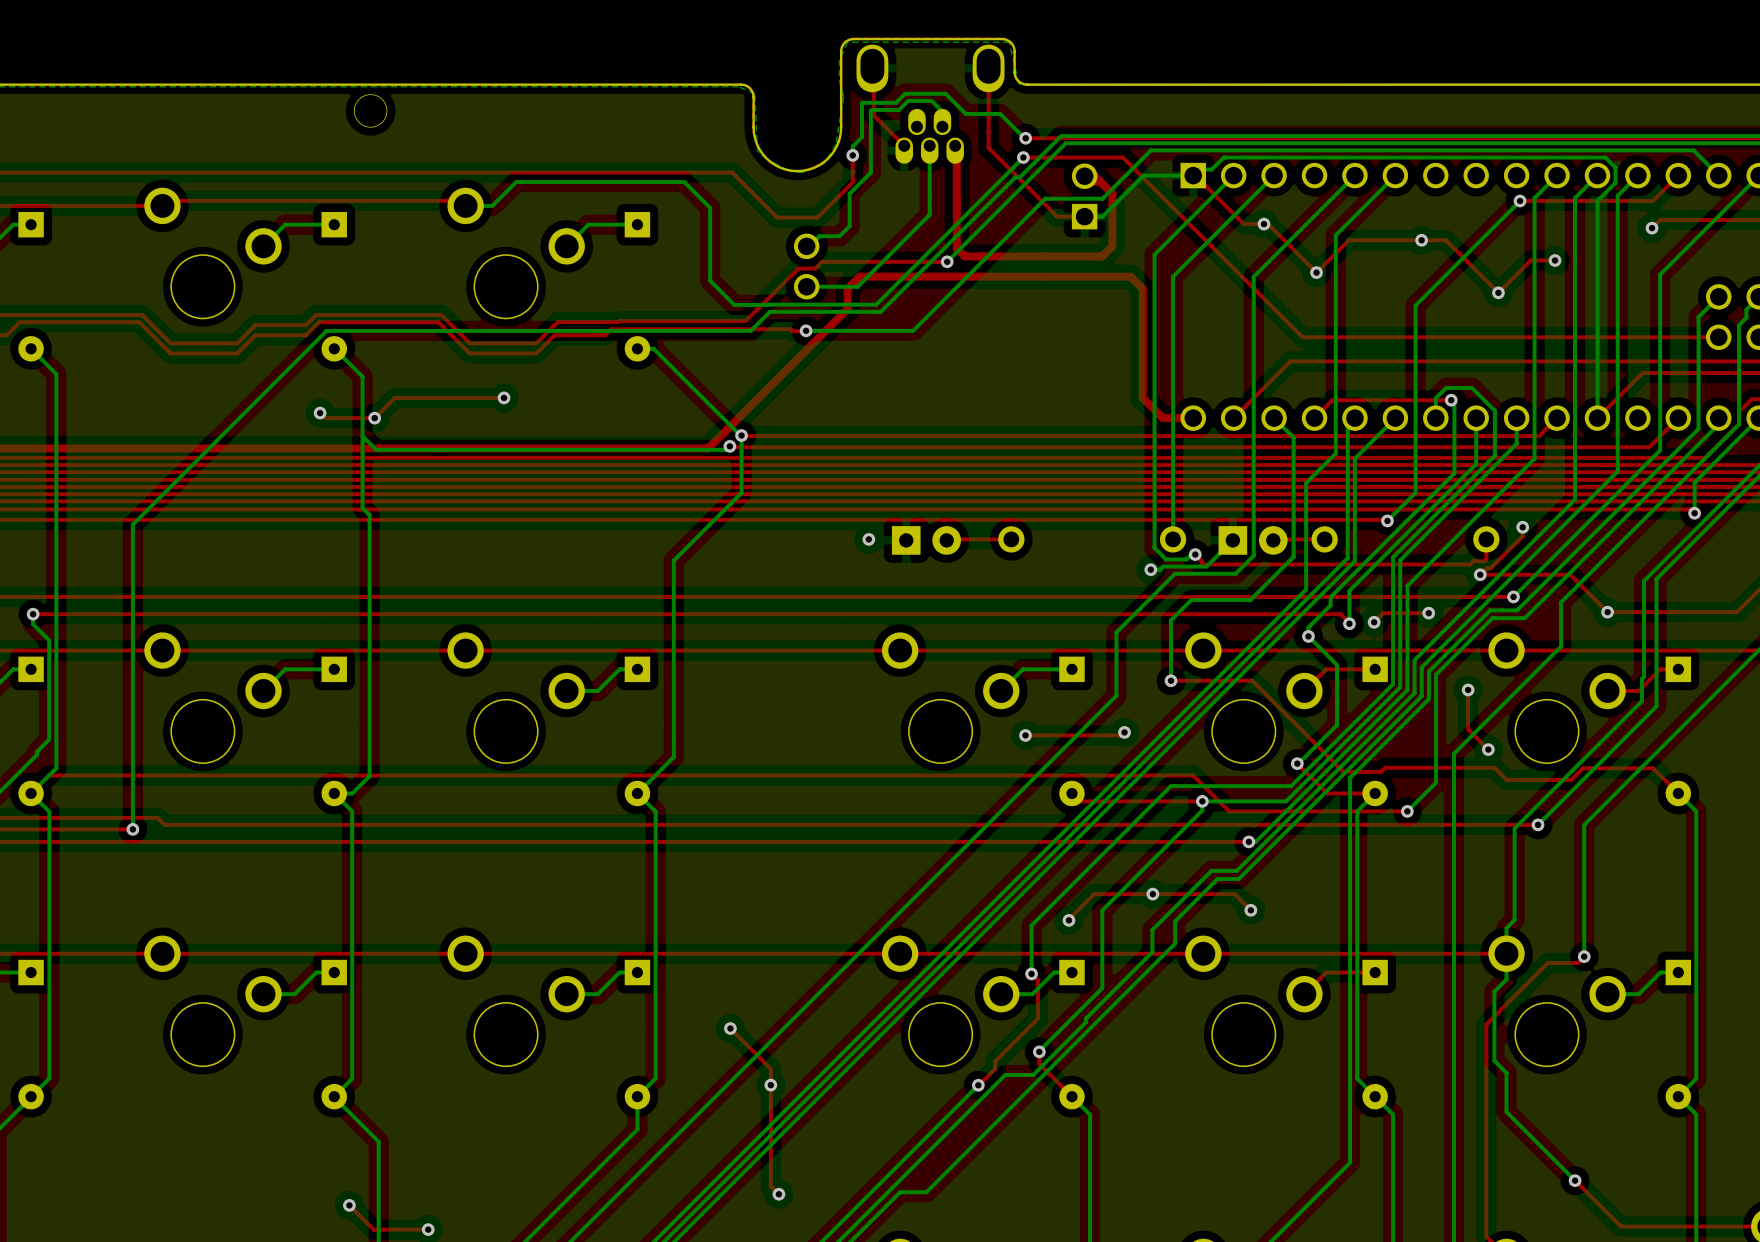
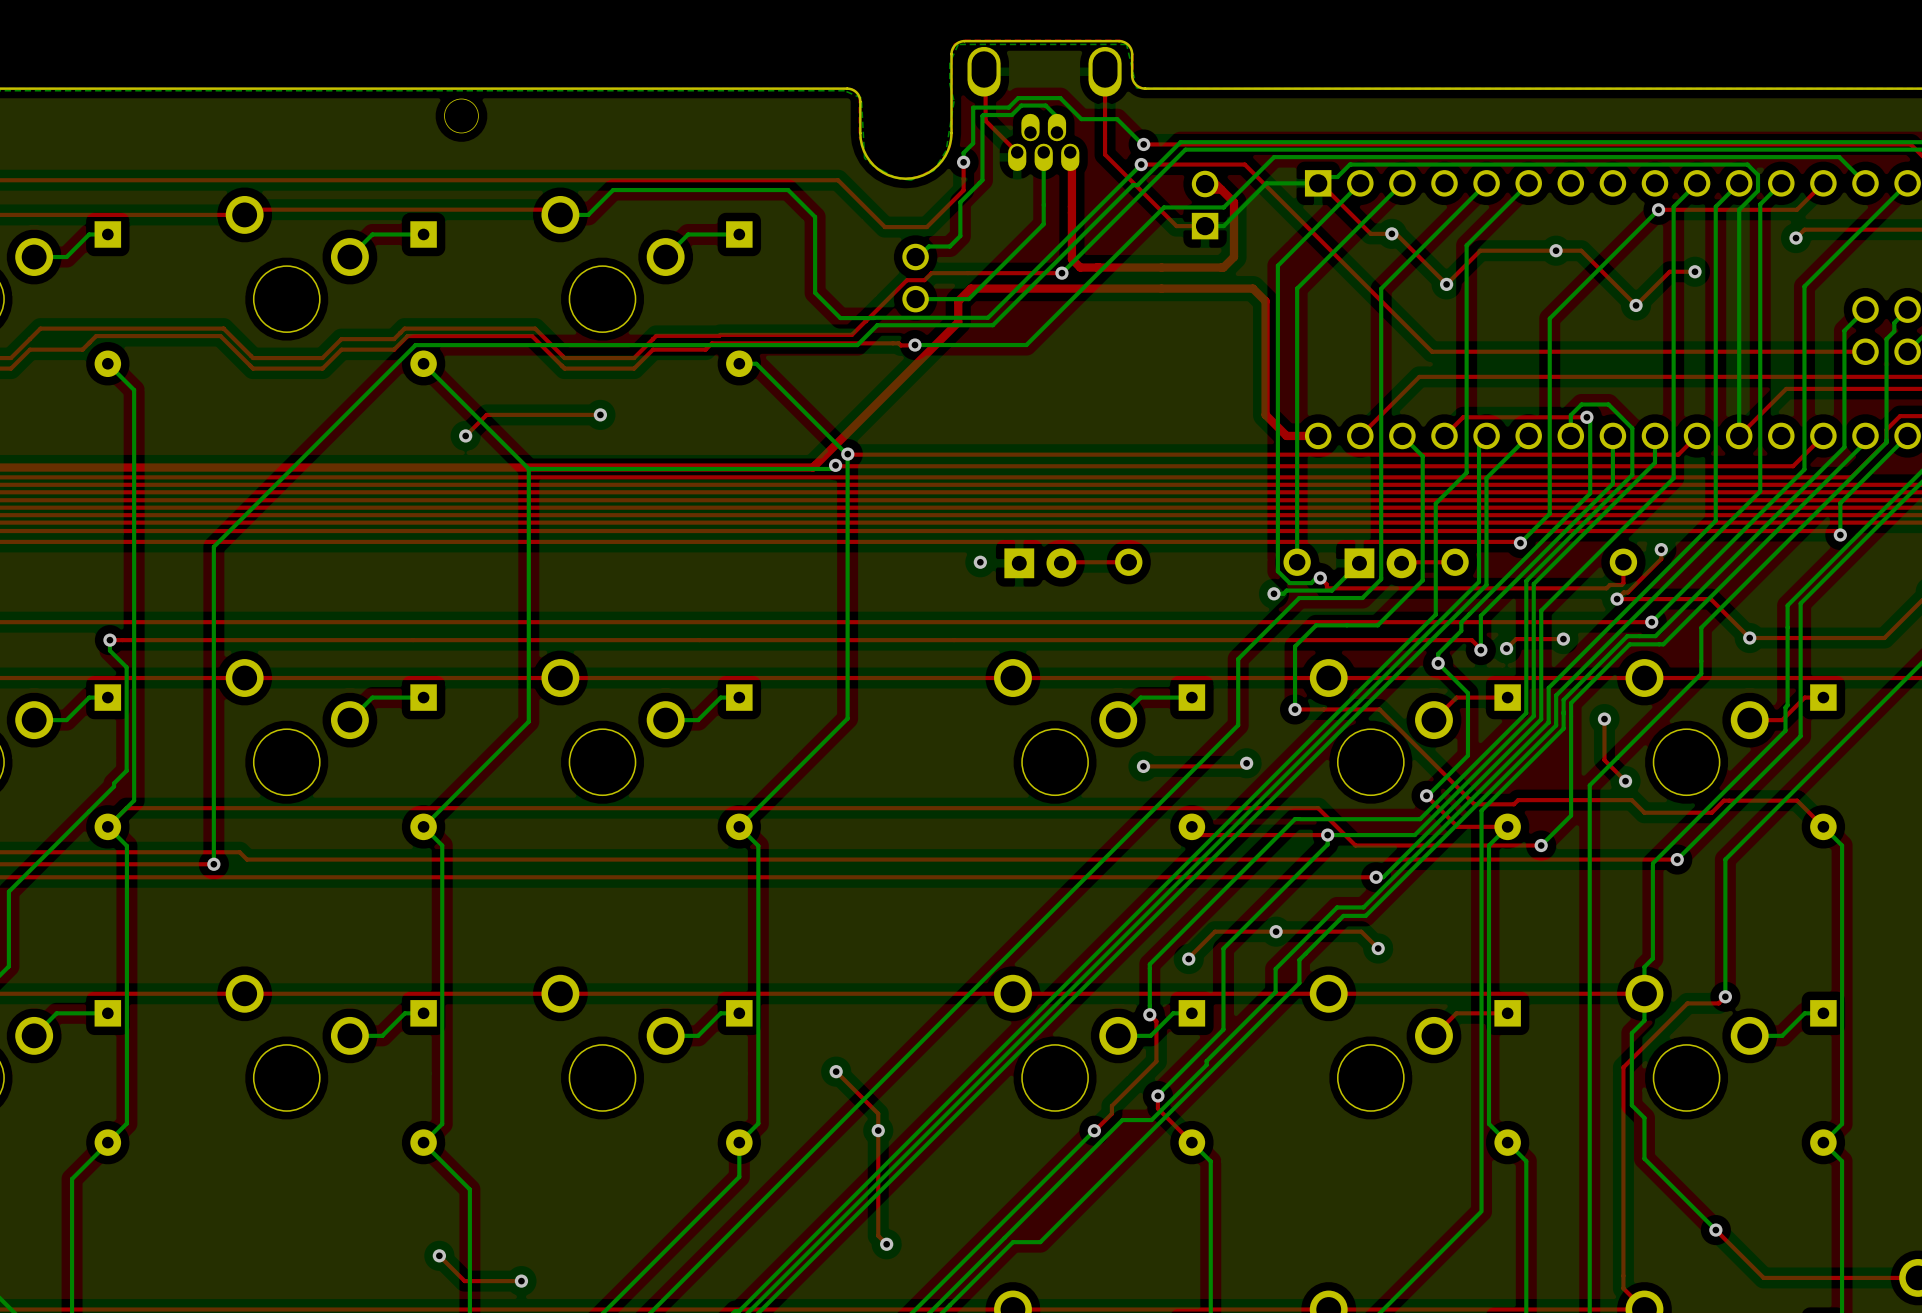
bottom track: (334, 348) (362, 376) (362, 508) (369, 515) (369, 776) (352, 793) (334, 793) -> (423, 363) (528, 468) (528, 721) (423, 826)
top track: (320, 413) (325, 418) (374, 418) -> none
via: (320, 413) -> none
bottom track: (741, 435) (741, 492) (673, 560) (673, 757) -> (847, 455) (847, 718) (777, 788)
bottom track: (362, 436) (376, 449) (435, 449) -> none

